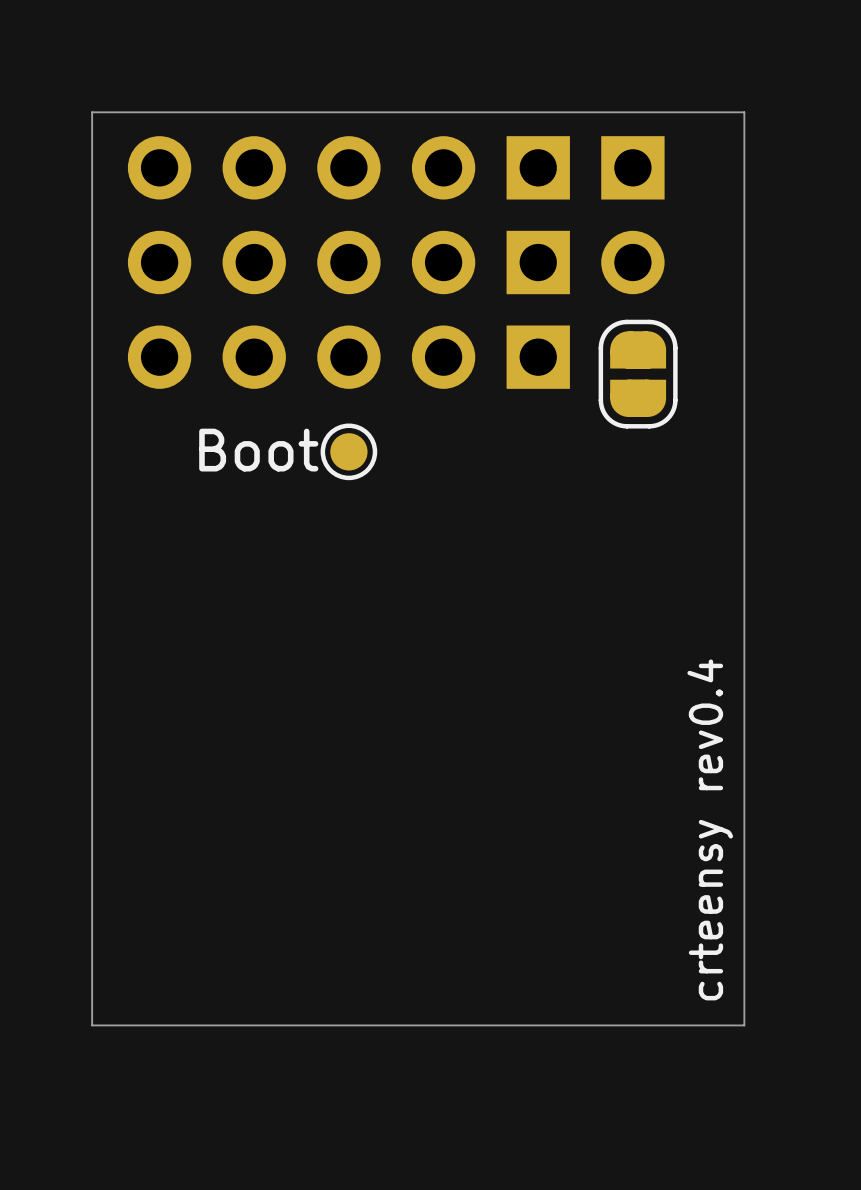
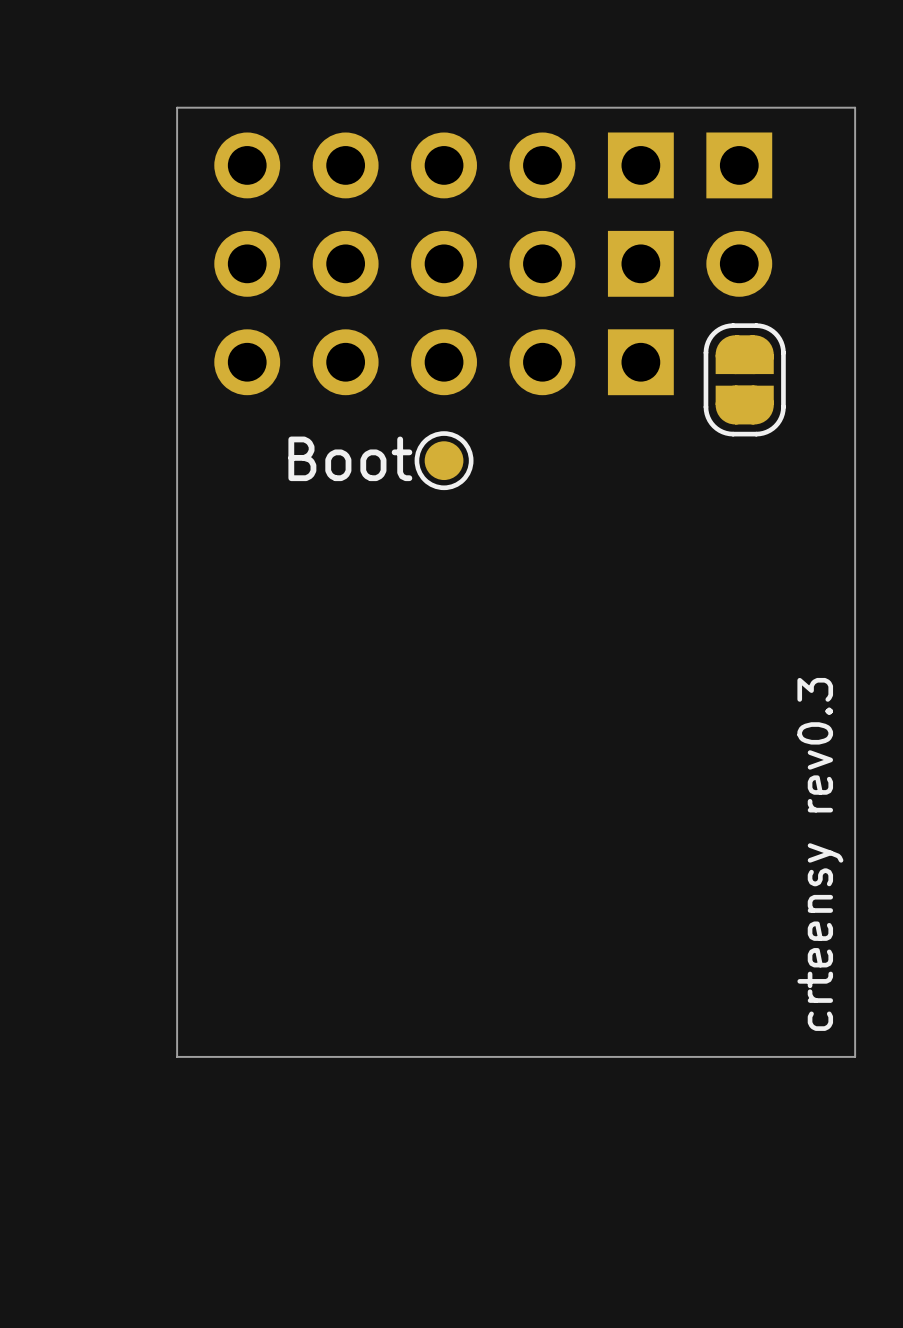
text: crteensy rev0.4 (710, 829) -> crteensy rev0.3 (820, 854)

